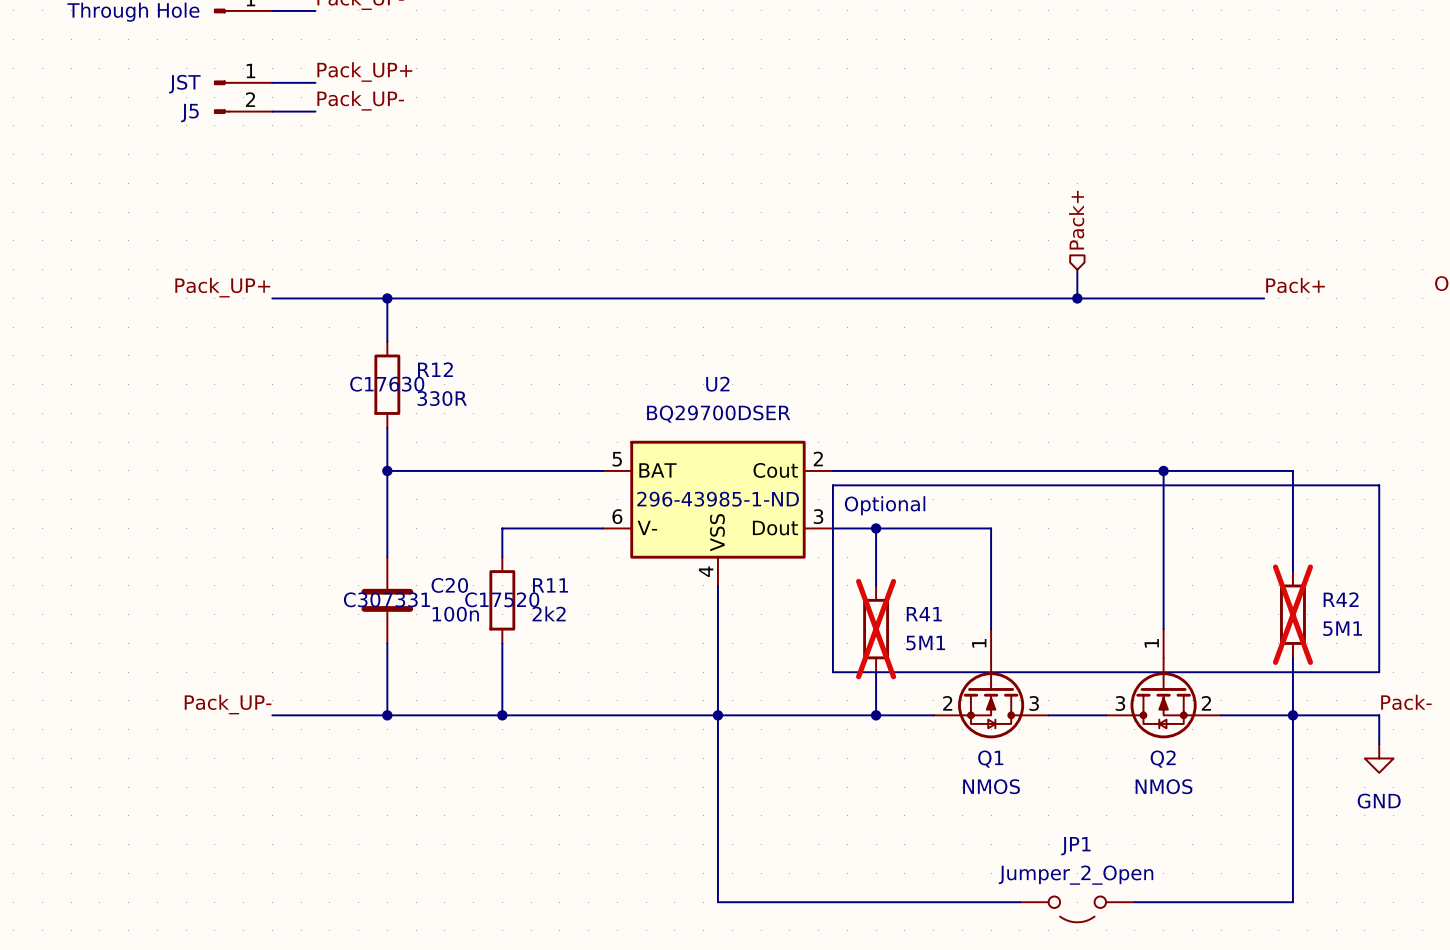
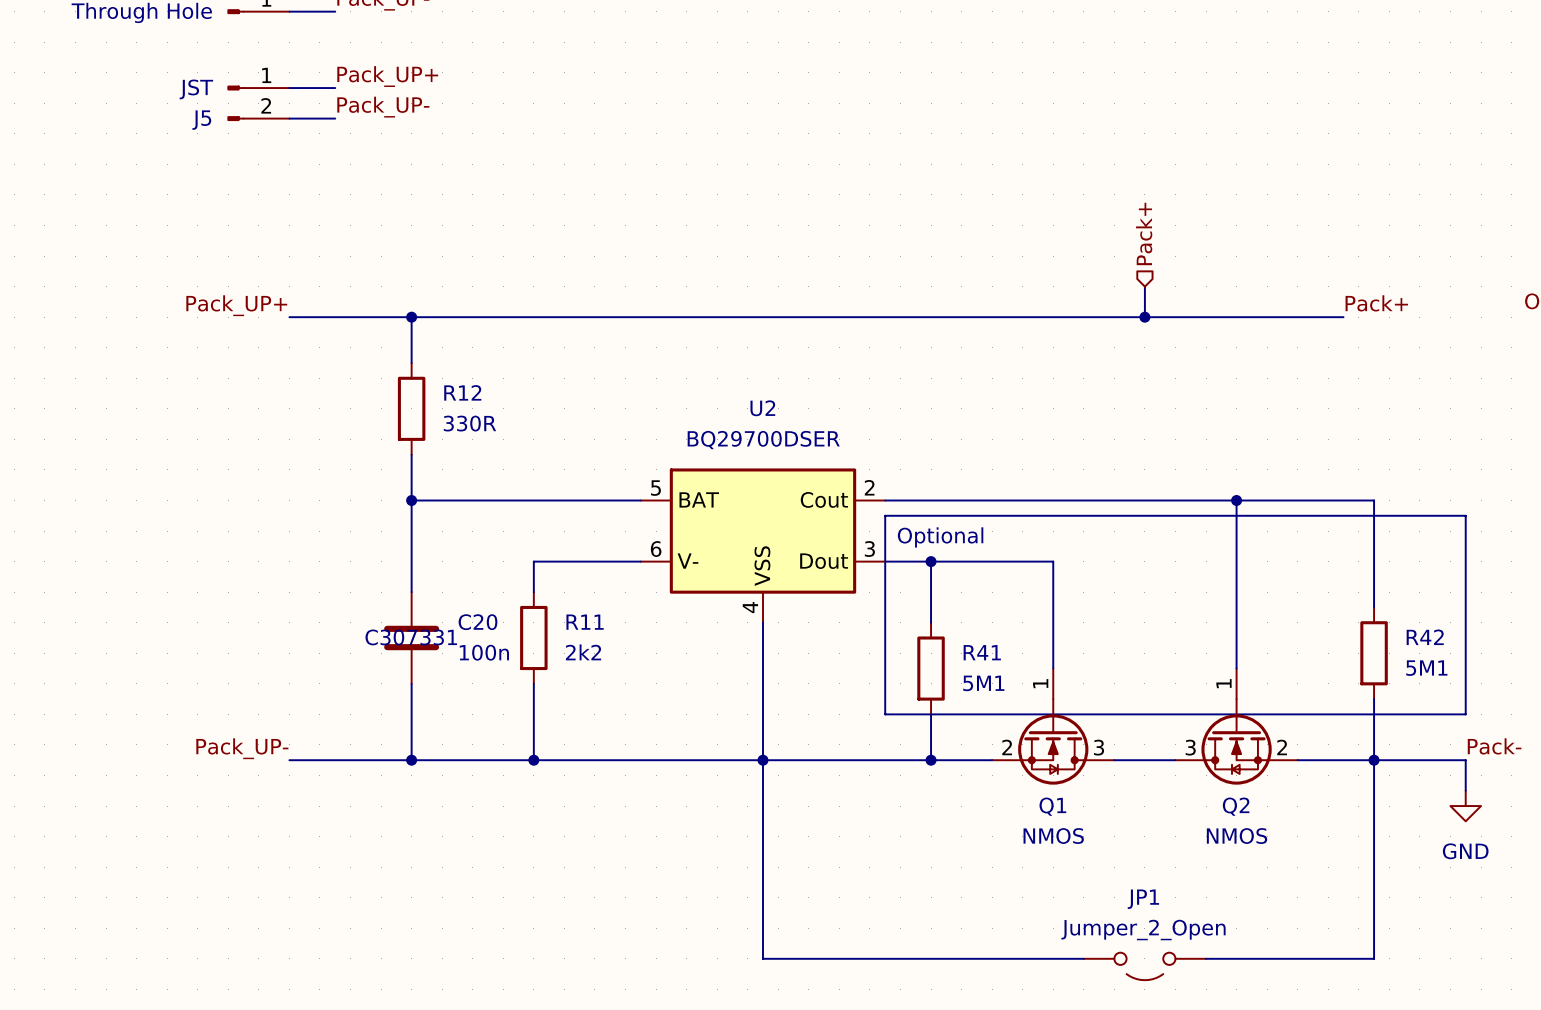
R12 text: C17630 (387, 384) -> none
U2 text: 296-43985-1-ND (718, 499) -> none
R11 text: C17520 (502, 599) -> none
R42 do-not-place cross: (1292, 614) -> none
R41 do-not-place cross: (876, 629) -> none

